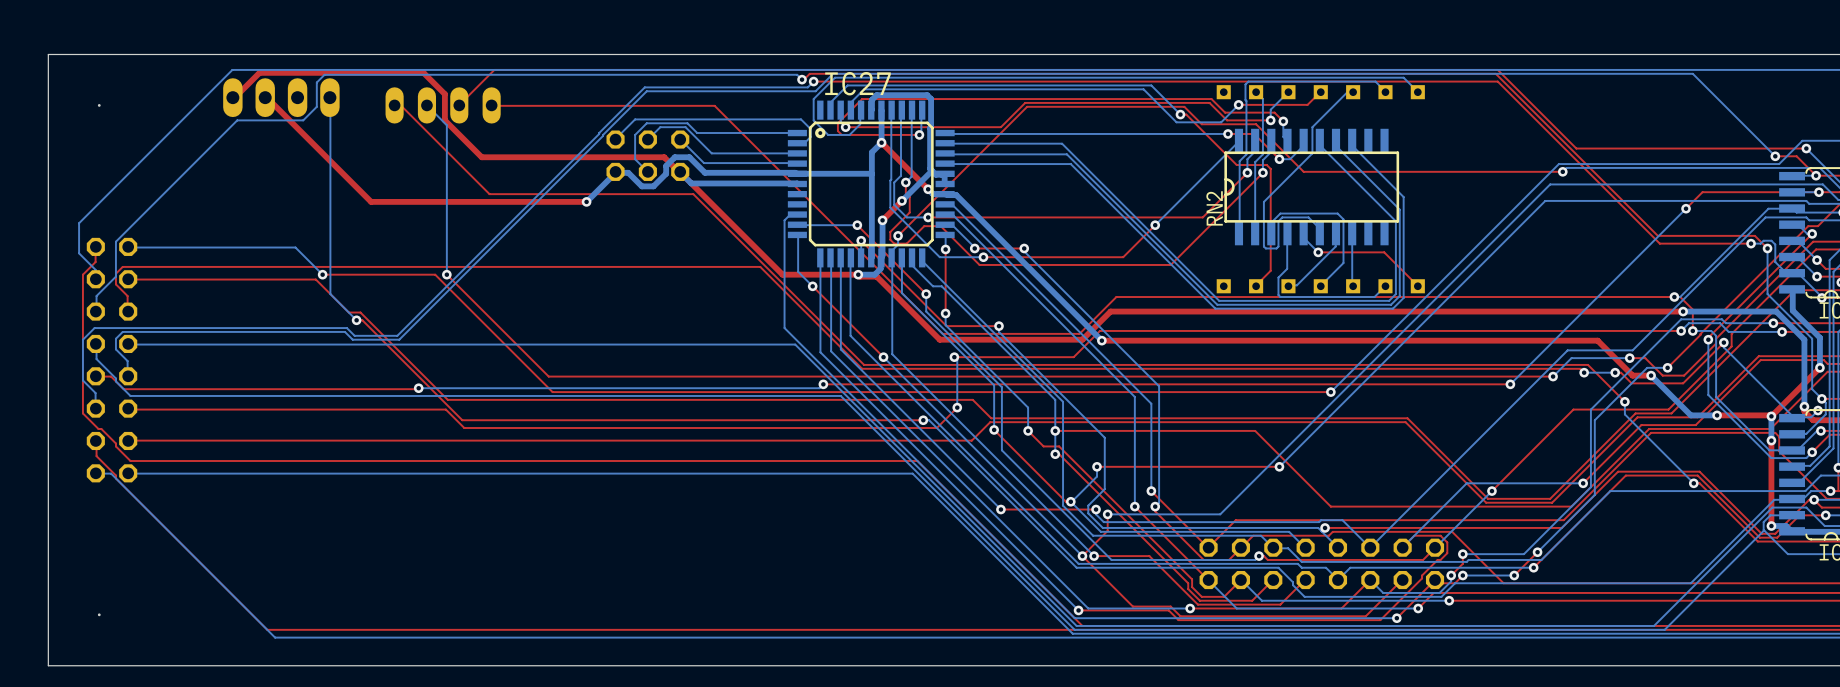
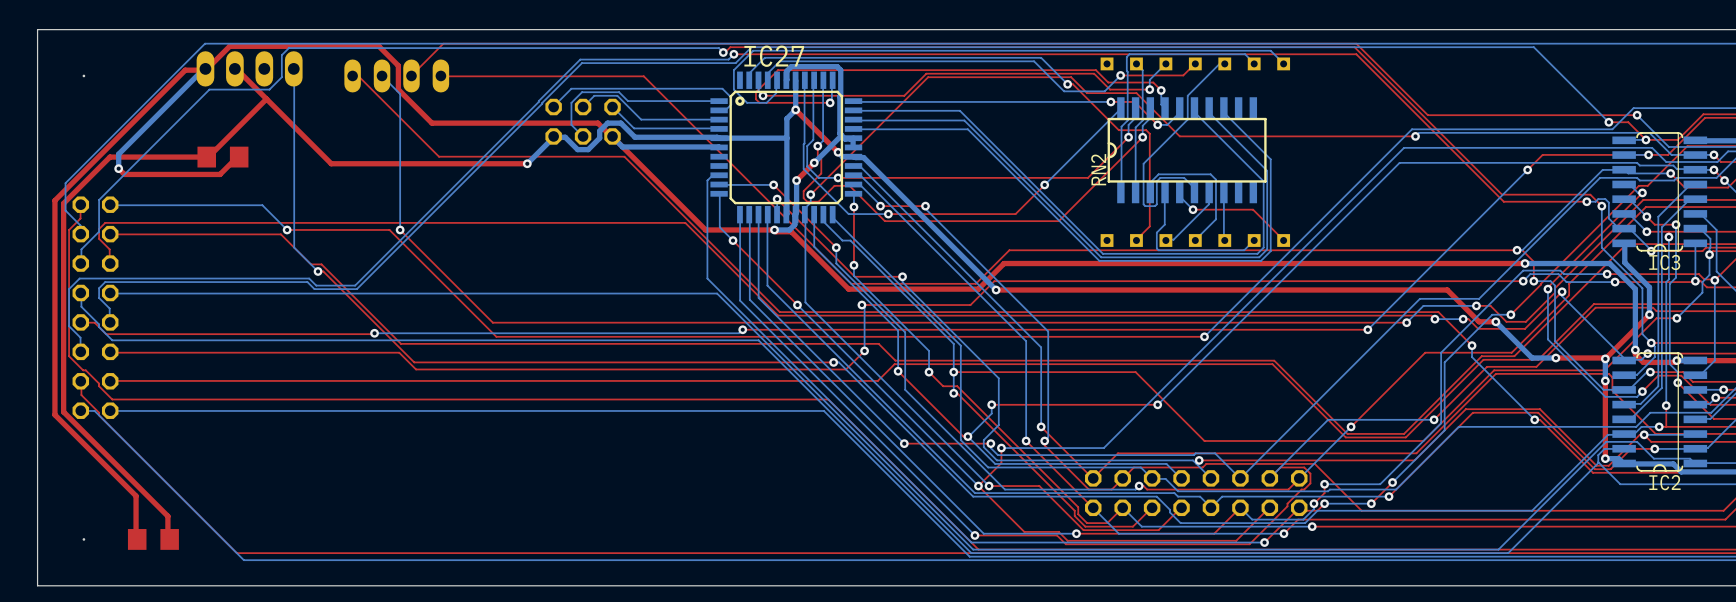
bottom track: none -> (205, 68) (118, 154) (118, 168)
top track: none -> (205, 68) (185, 70) (54, 200) (54, 414) (136, 495) (137, 539)
top track: none -> (266, 99) (208, 157) (109, 157) (63, 203) (63, 411) (167, 516) (167, 539) (169, 539)
part: none -> (222, 157)
top track: none -> (239, 157) (220, 174) (124, 174) (118, 168)
via: none -> (118, 168)
part: none -> (153, 539)

